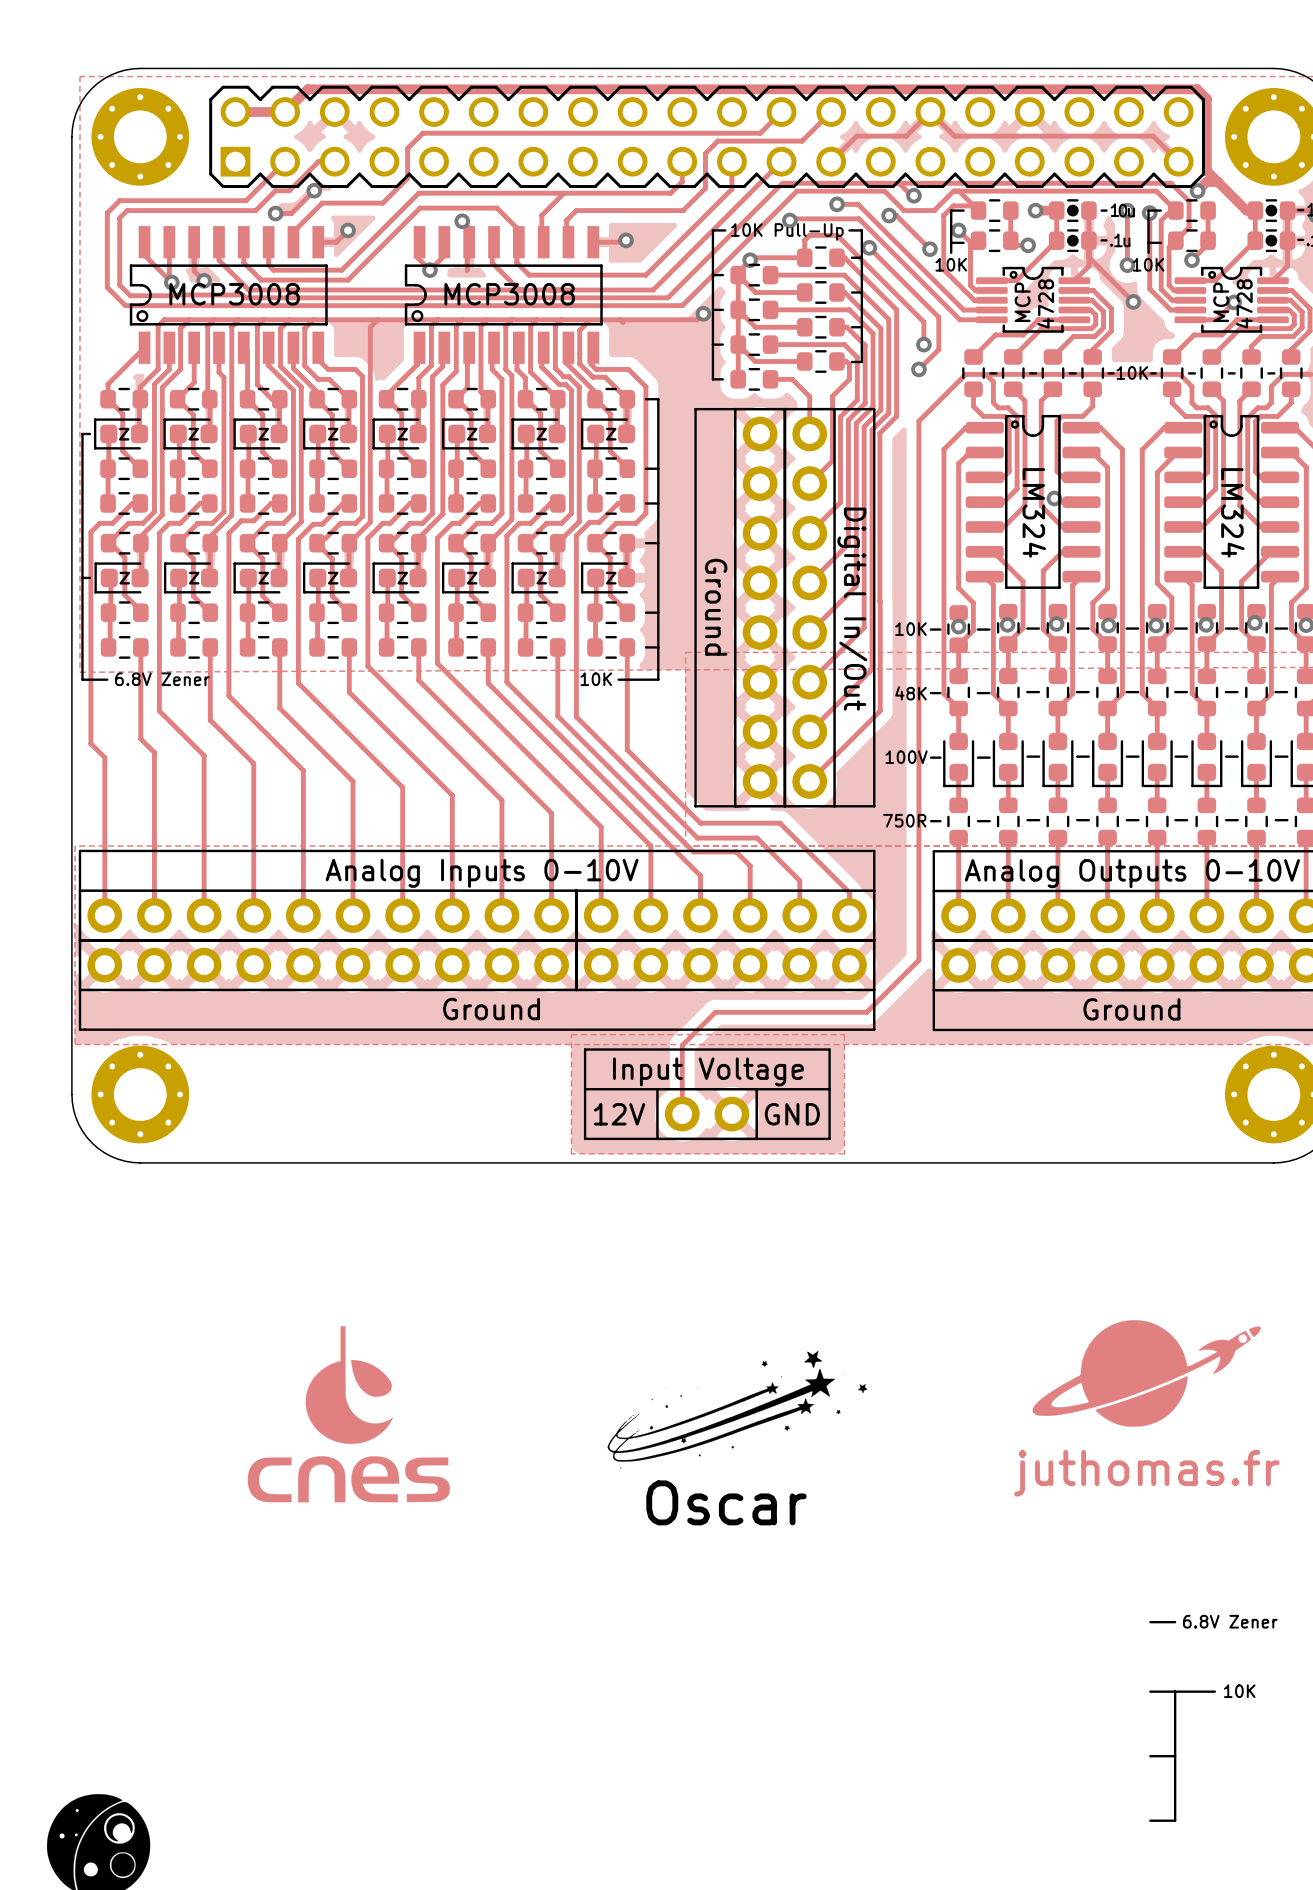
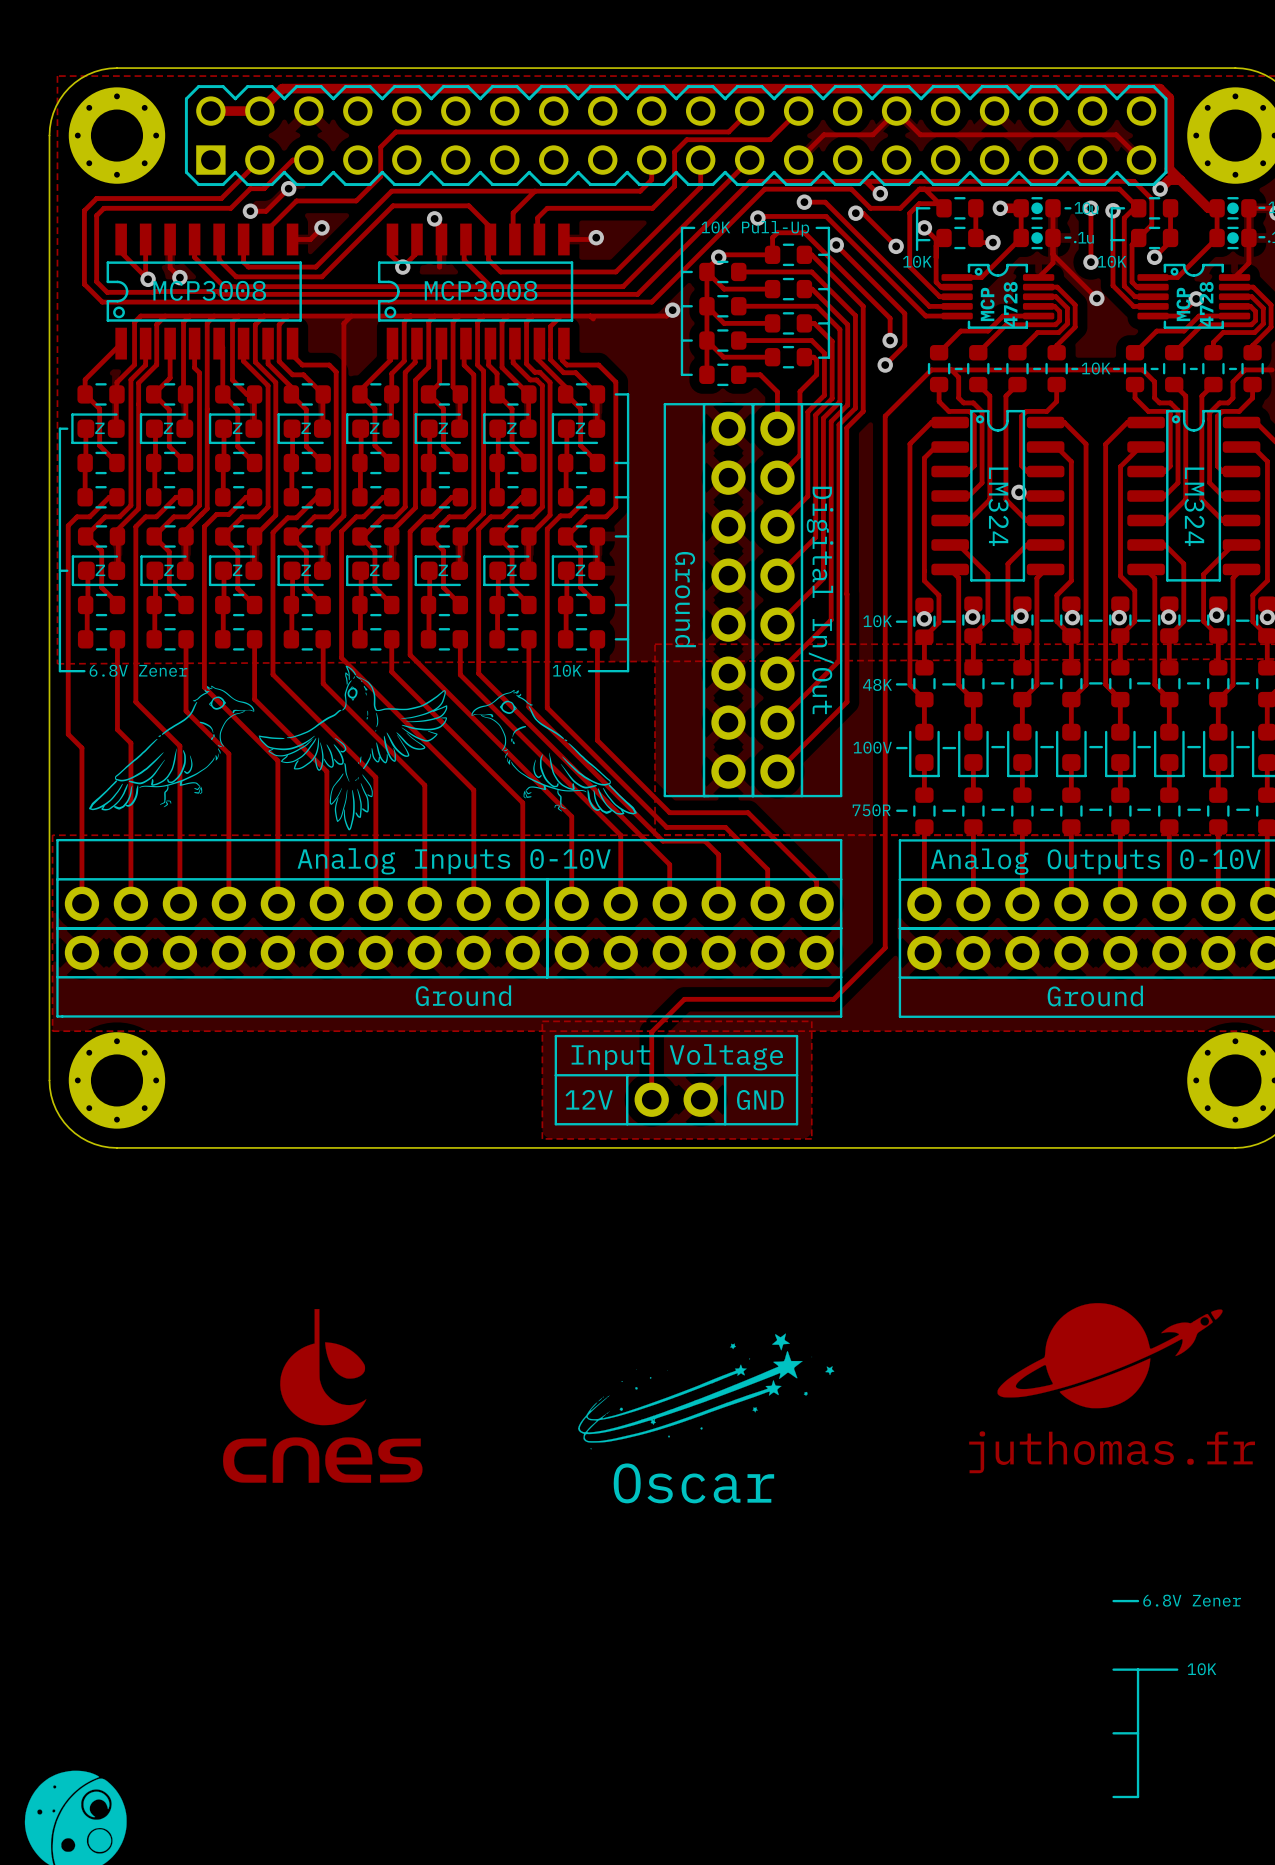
drawing: none -> [89, 665, 448, 831]
drawing: none -> [471, 689, 637, 815]

